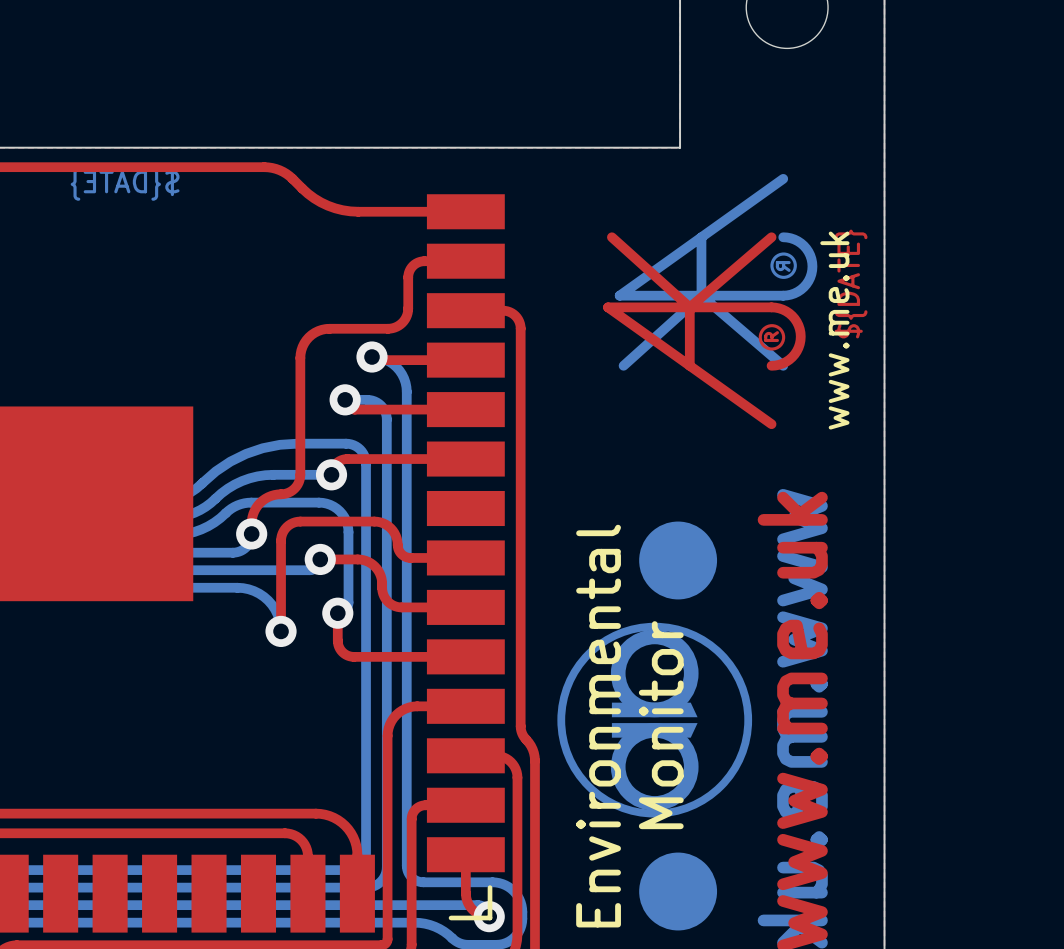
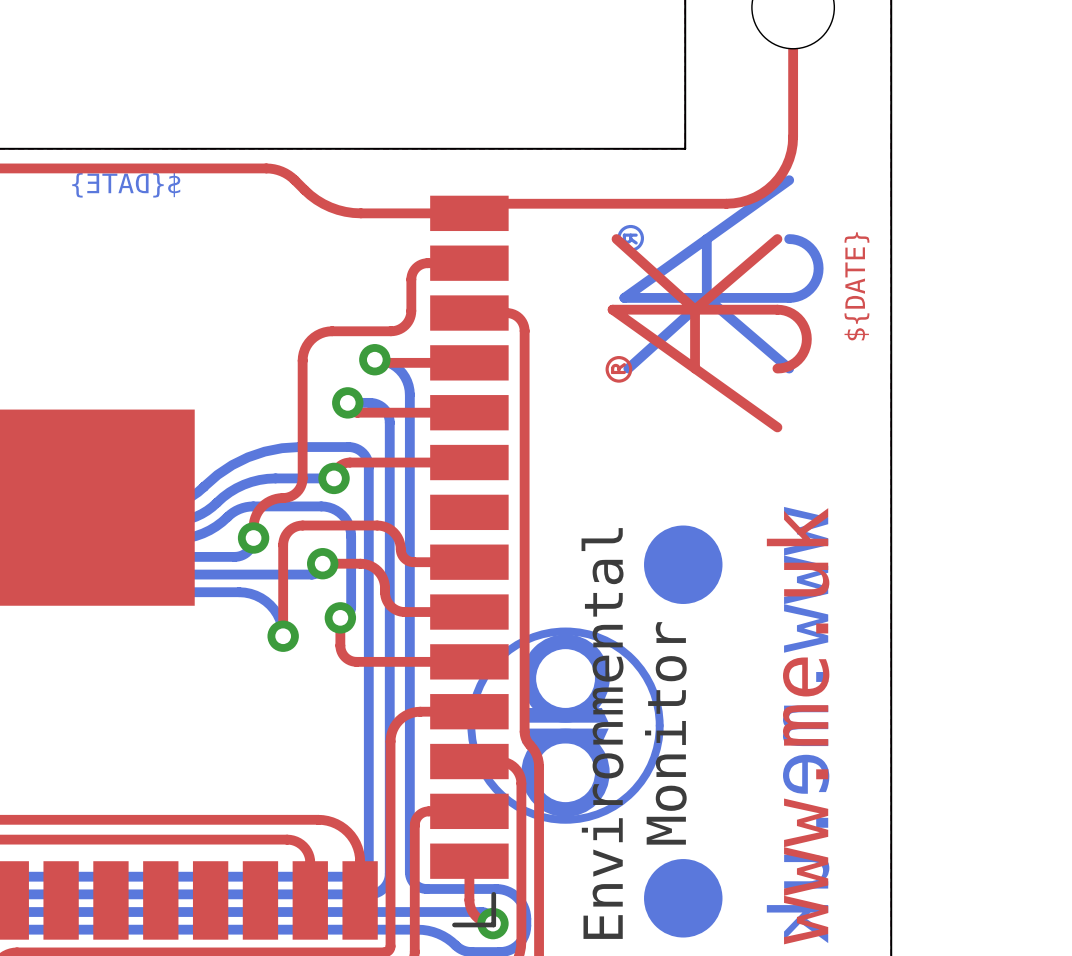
top track: none -> (793, 7) (792, 144) (789, 159) (782, 172) (773, 184) (761, 193) (748, 200) (726, 203) (469, 203)
drawing shape: [614, 173, 818, 371] -> [617, 175, 824, 374]
drawing shape: [603, 231, 850, 430] -> [605, 234, 812, 433]
drawing: [557, 622, 753, 818] -> none
part: none -> (565, 725)

